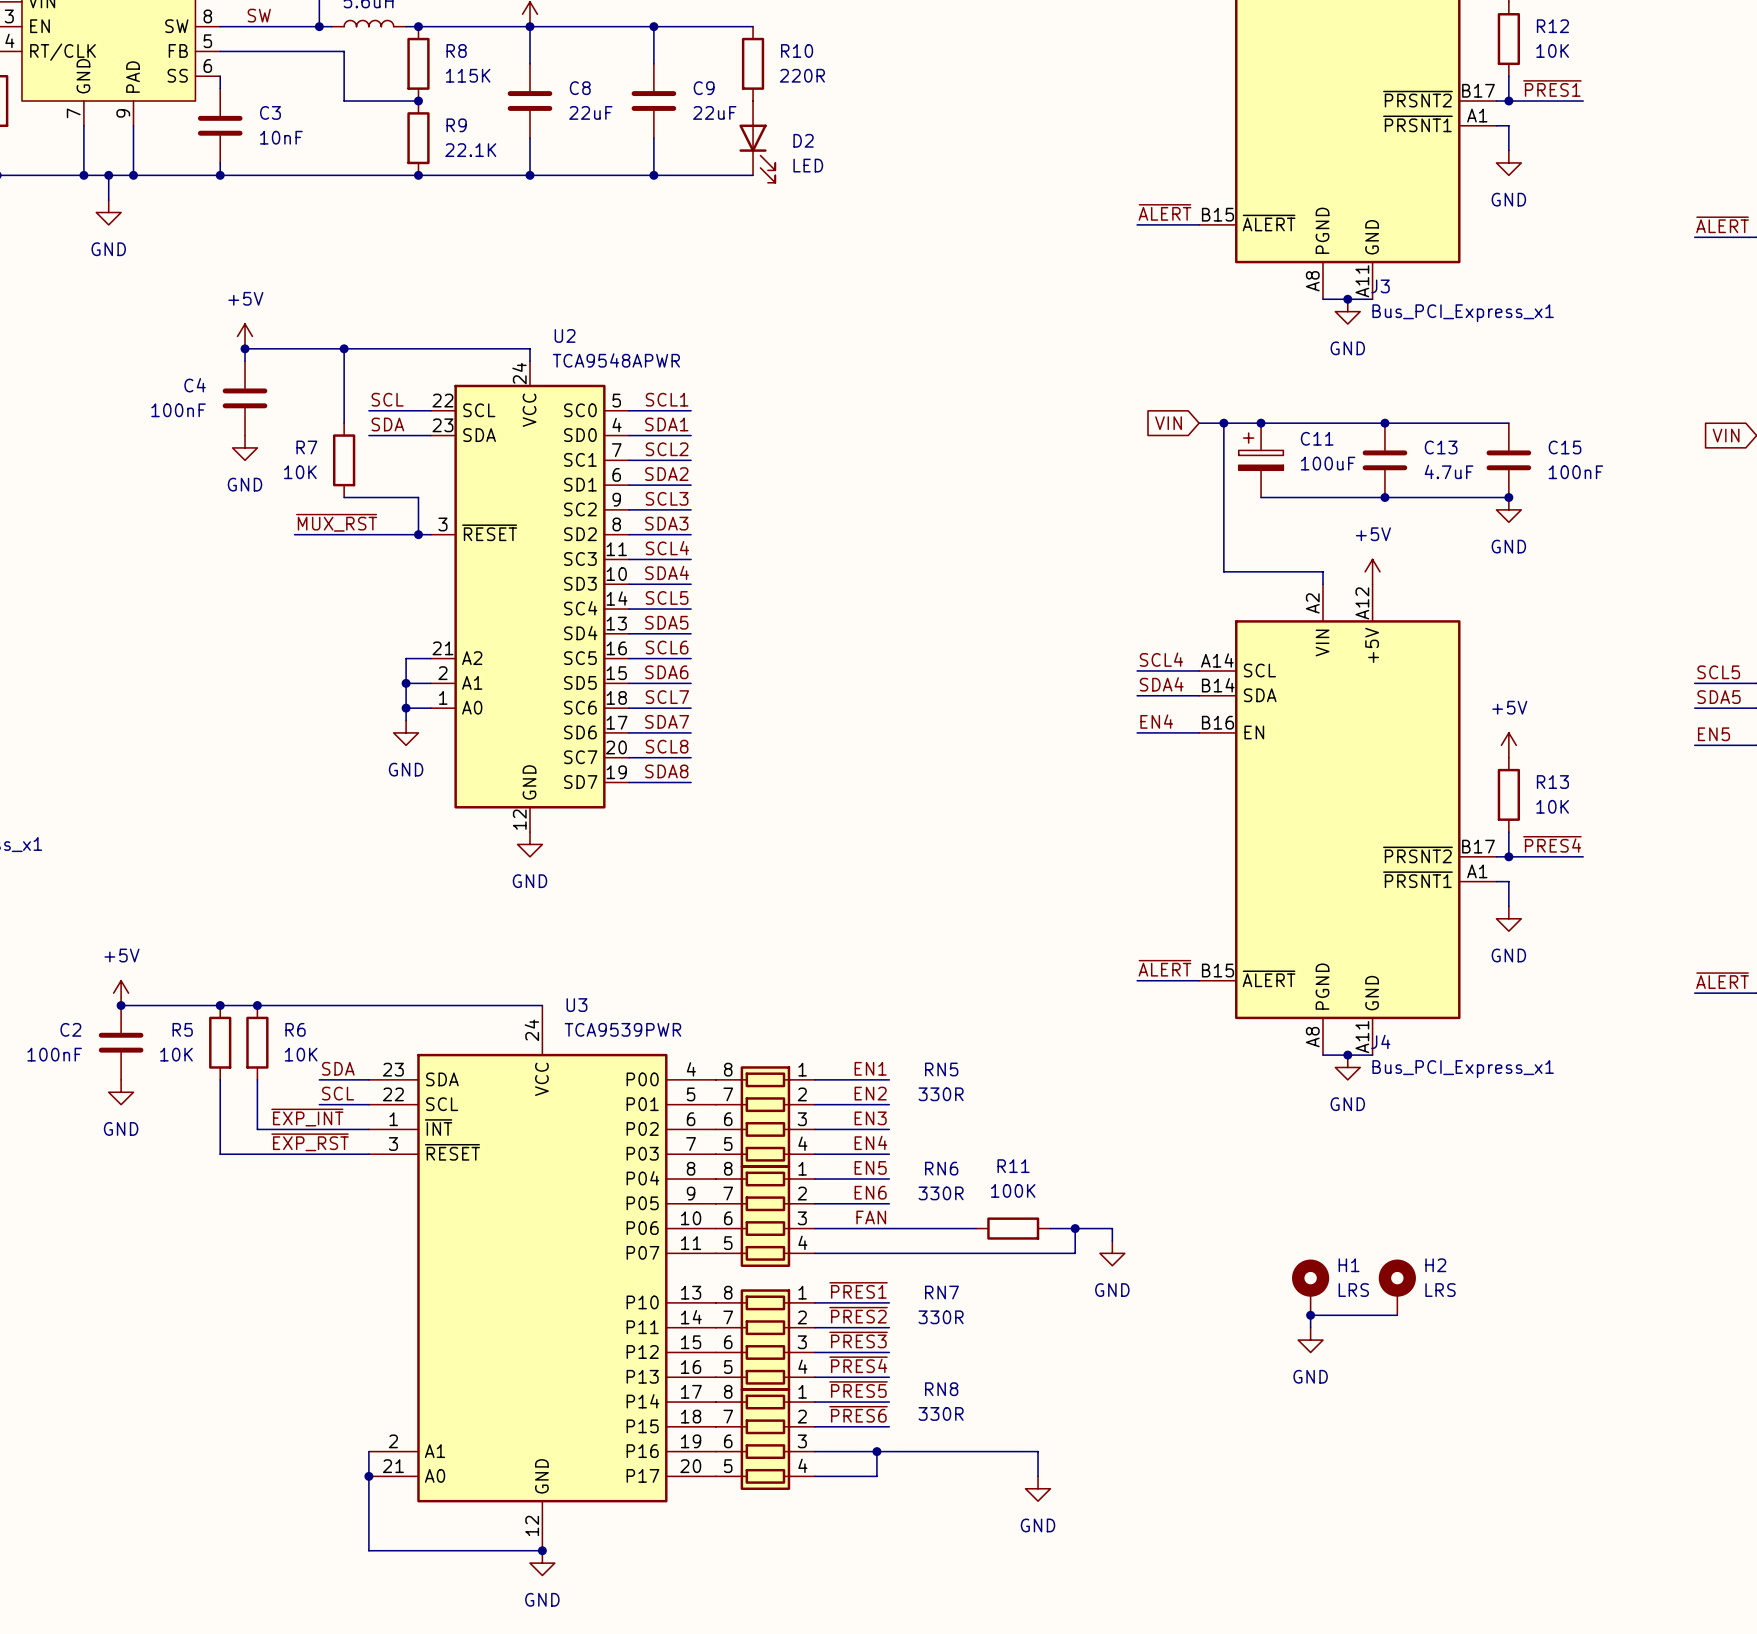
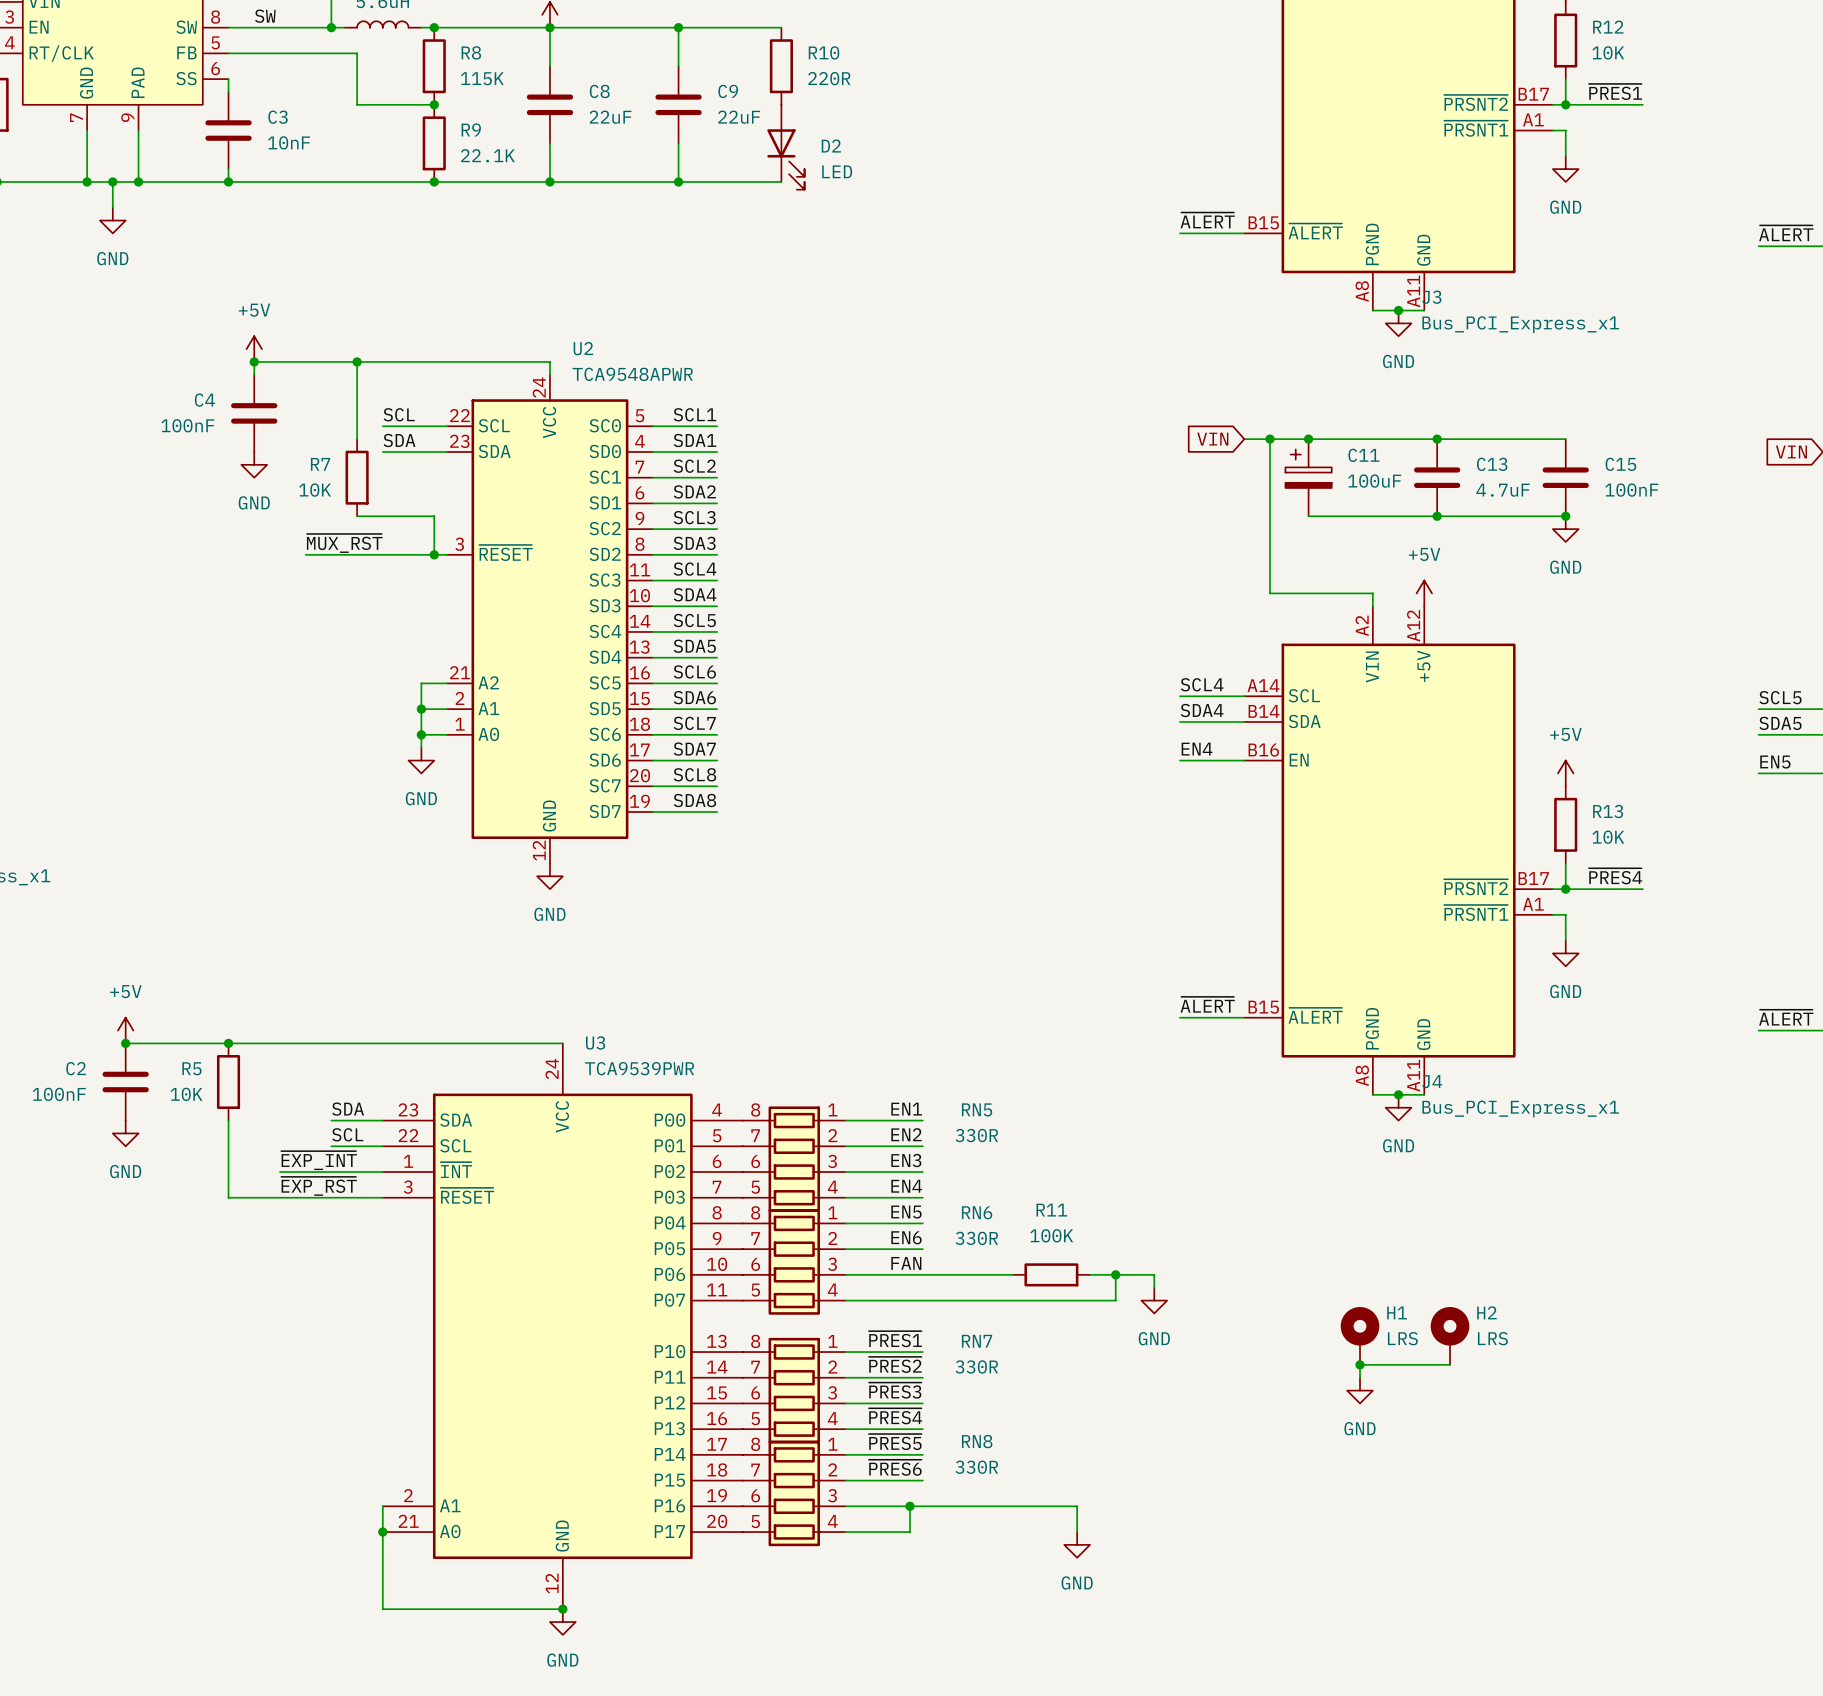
junction: (257, 1005) -> none
R6: 10K (257, 1042) -> none
wire: (257, 1079) (257, 1129) (269, 1129) -> none

